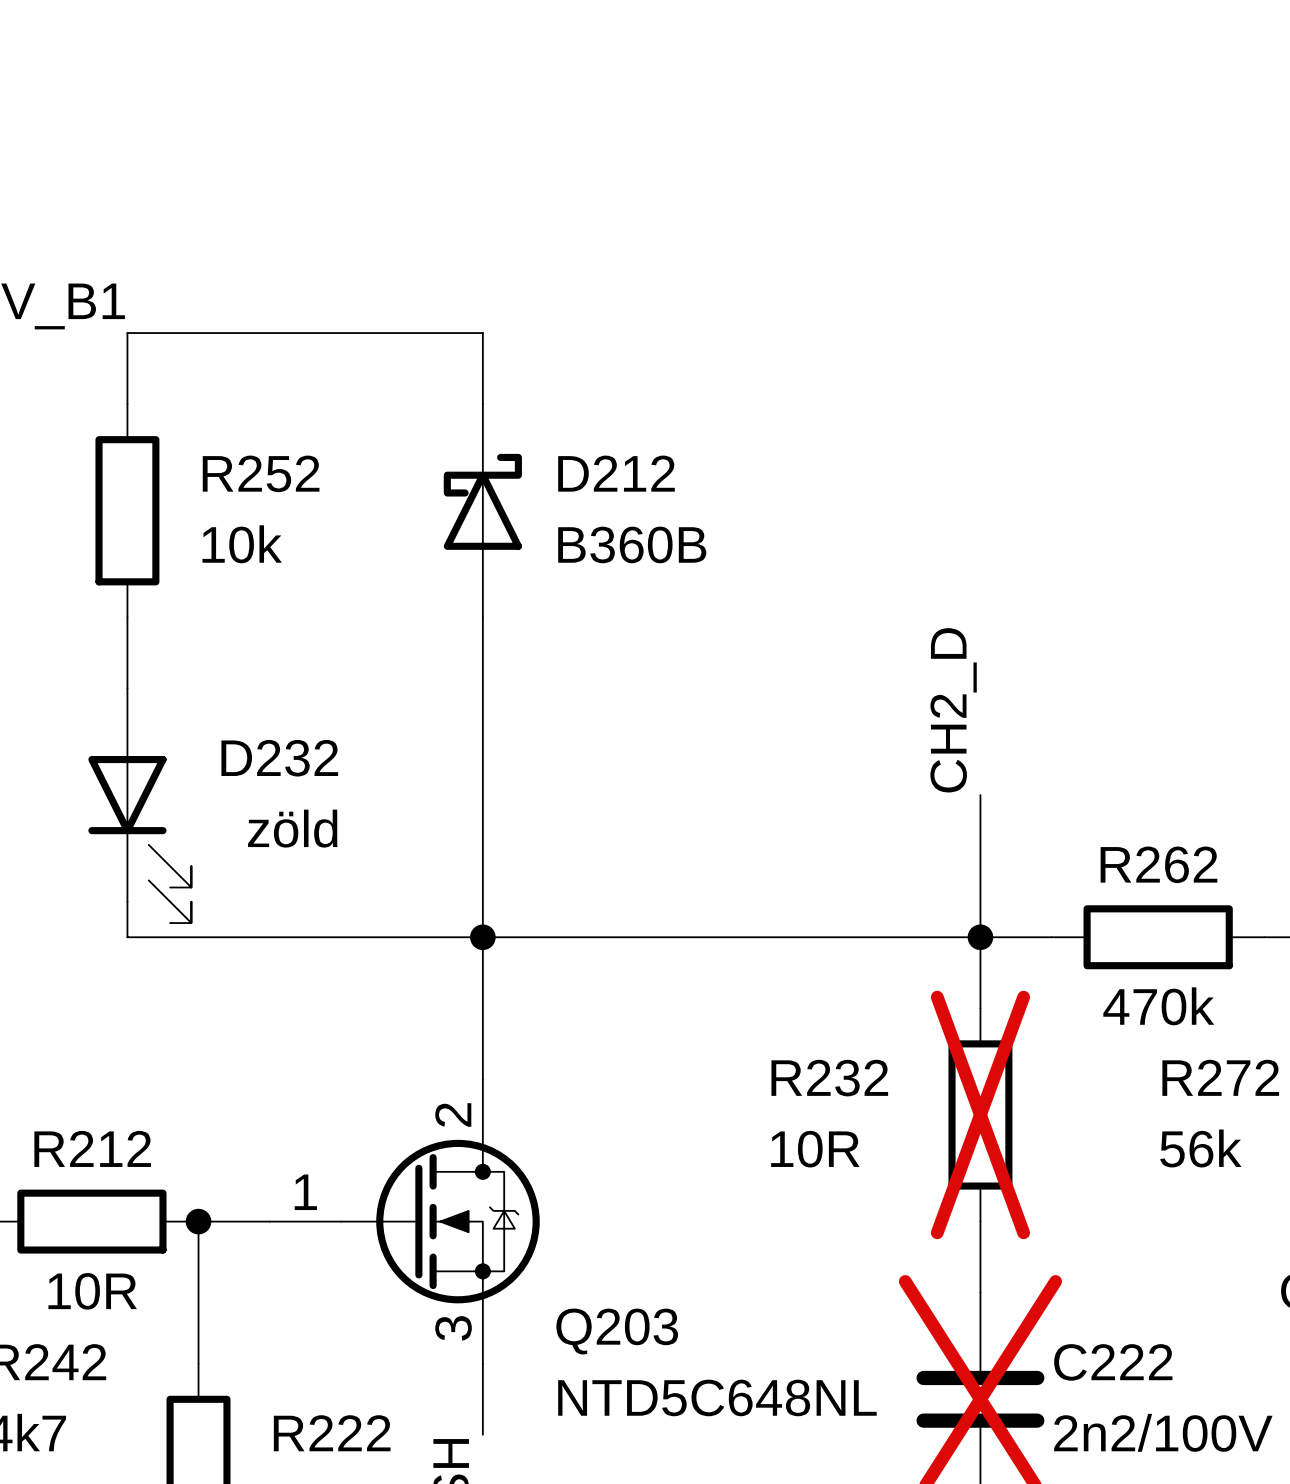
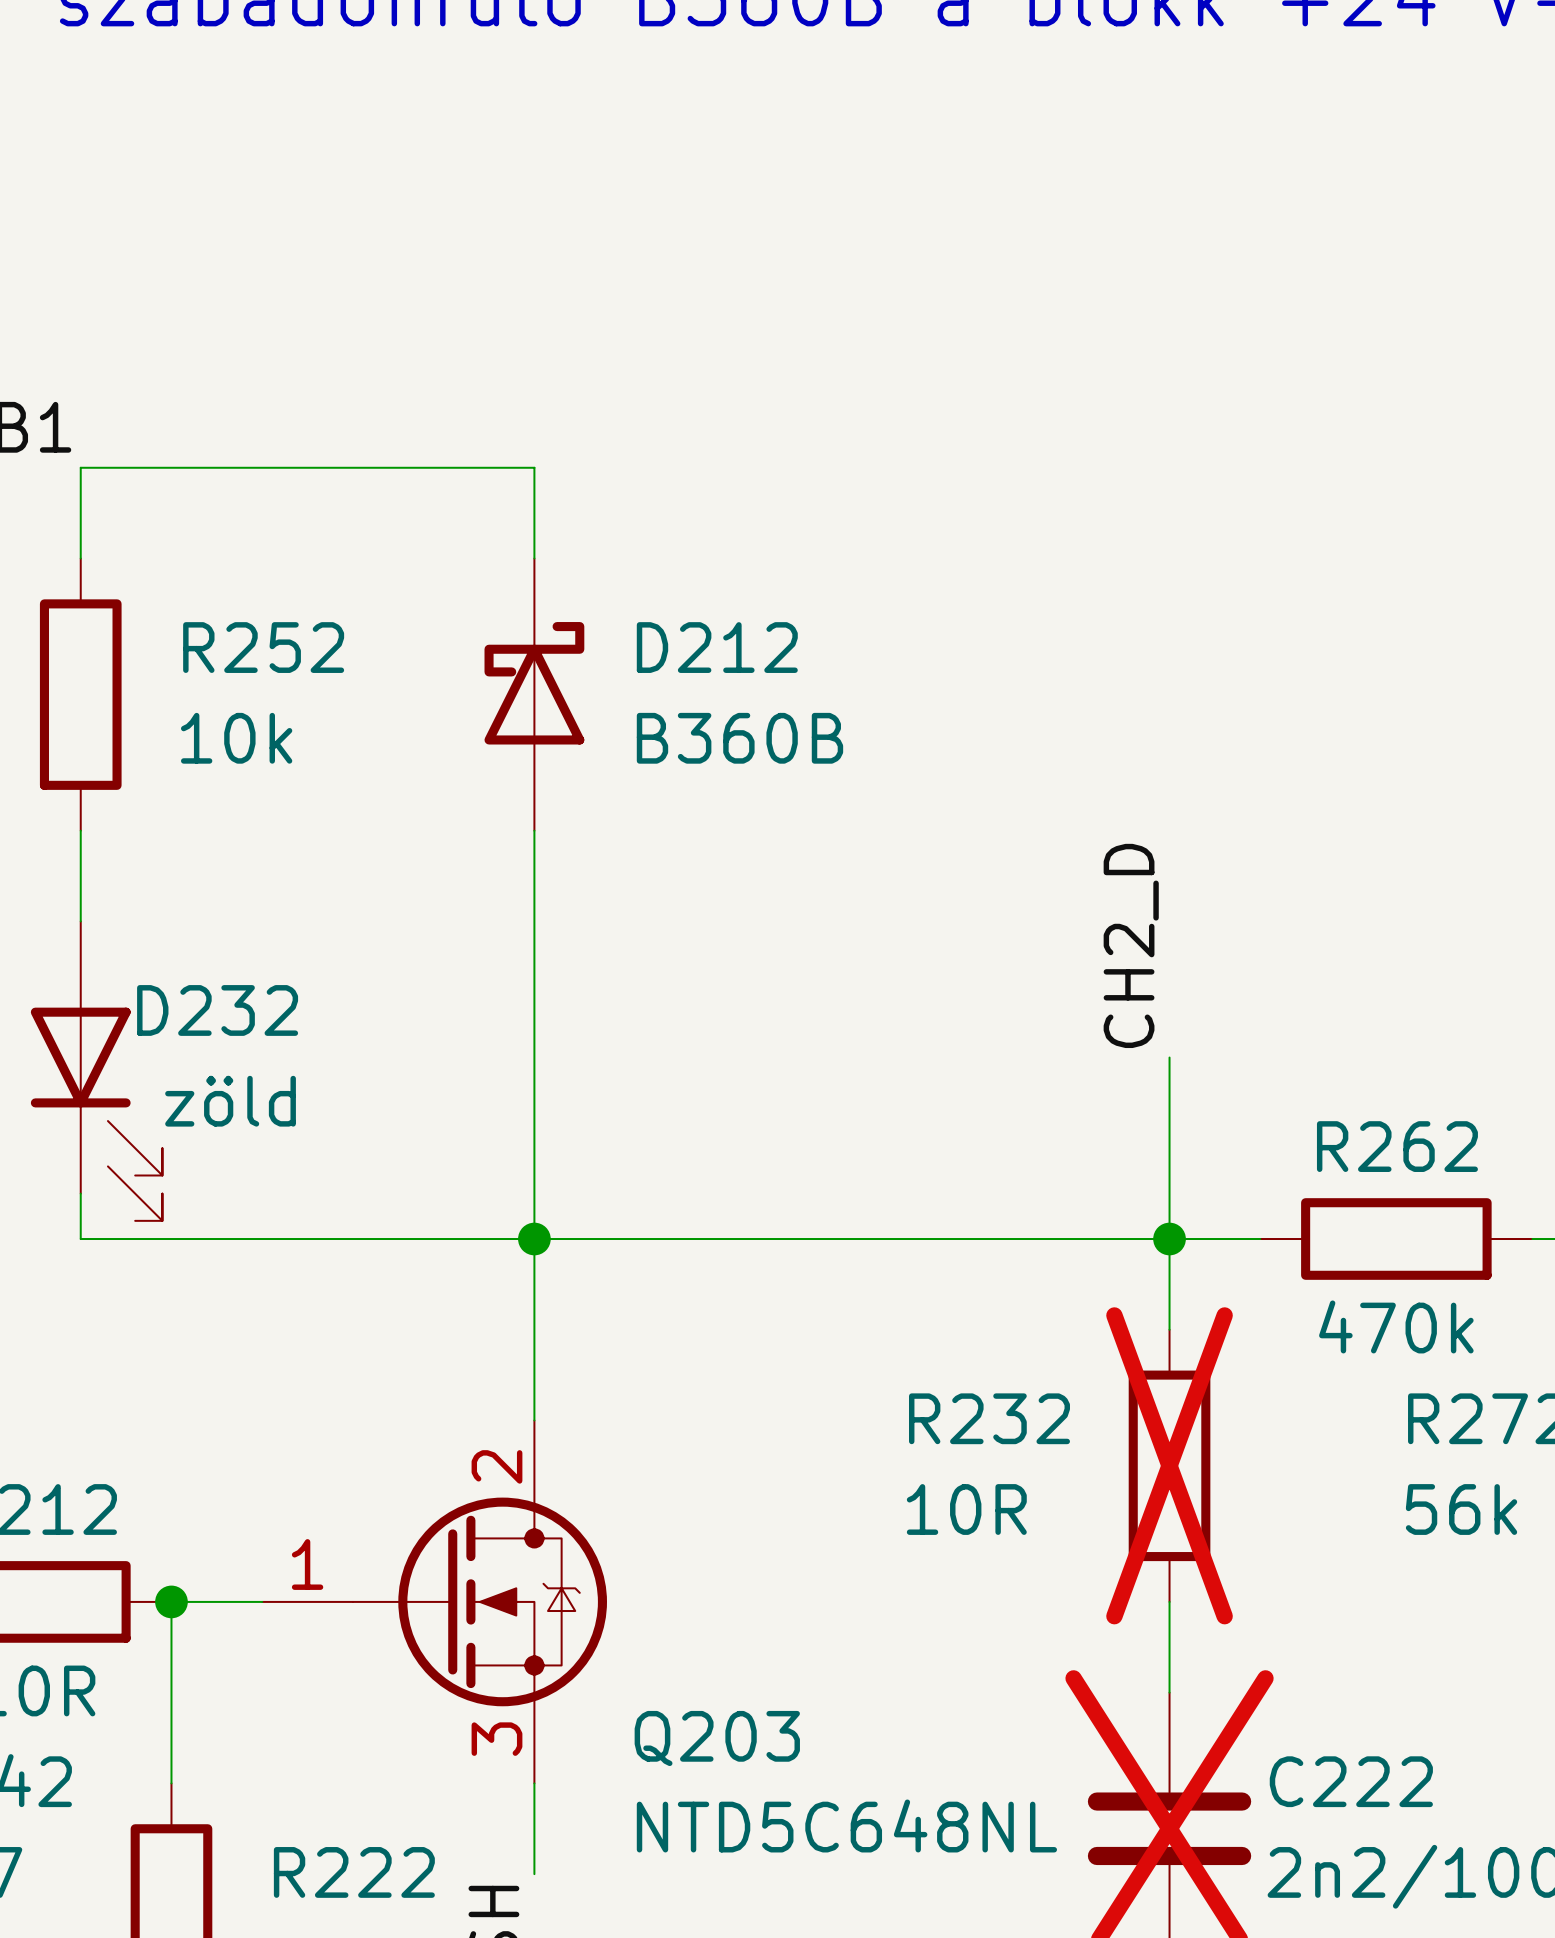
D232 name position: D232 (279, 758) -> D232 (217, 1010)
D232 value position: zöld (292, 828) -> zöld (230, 1101)

